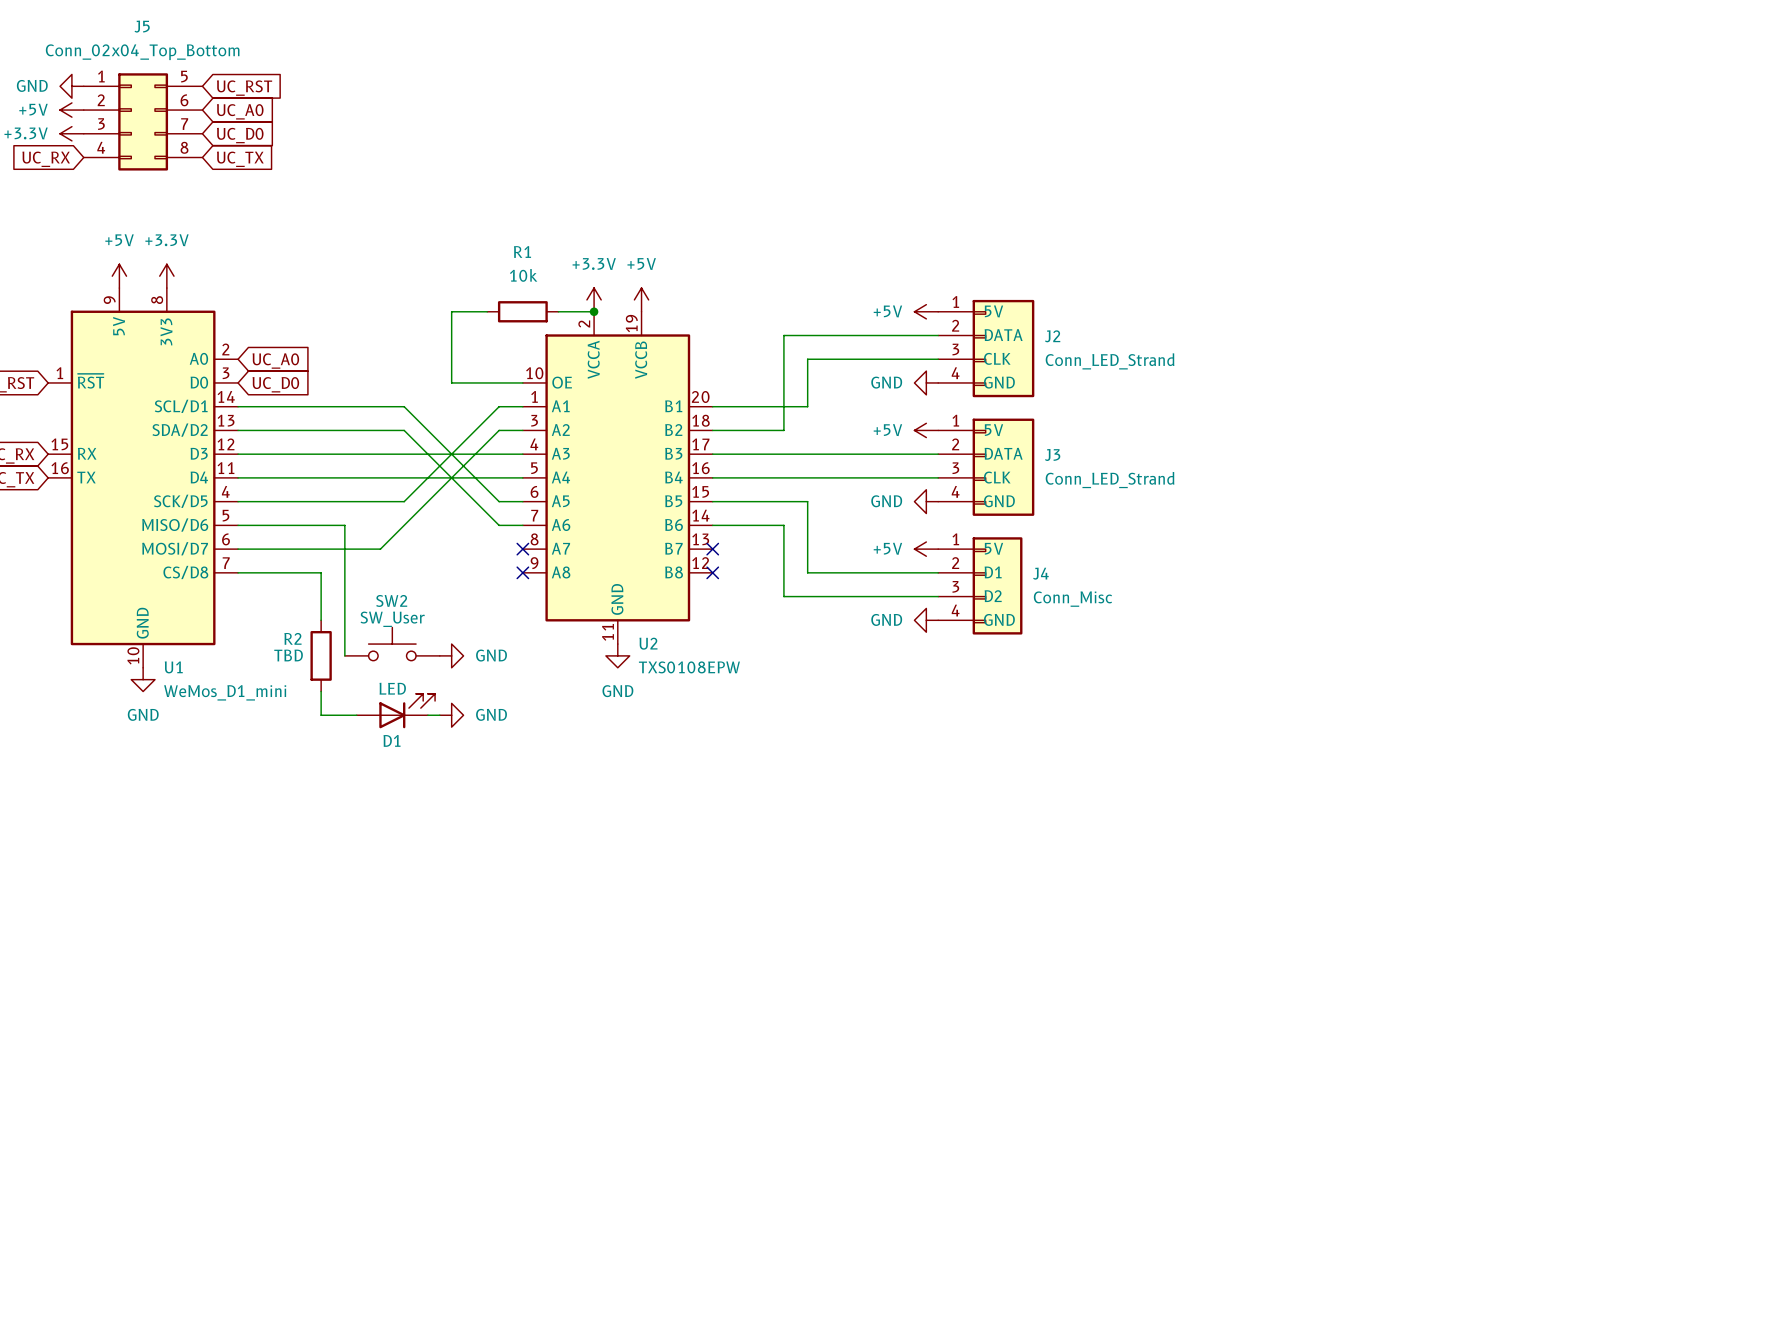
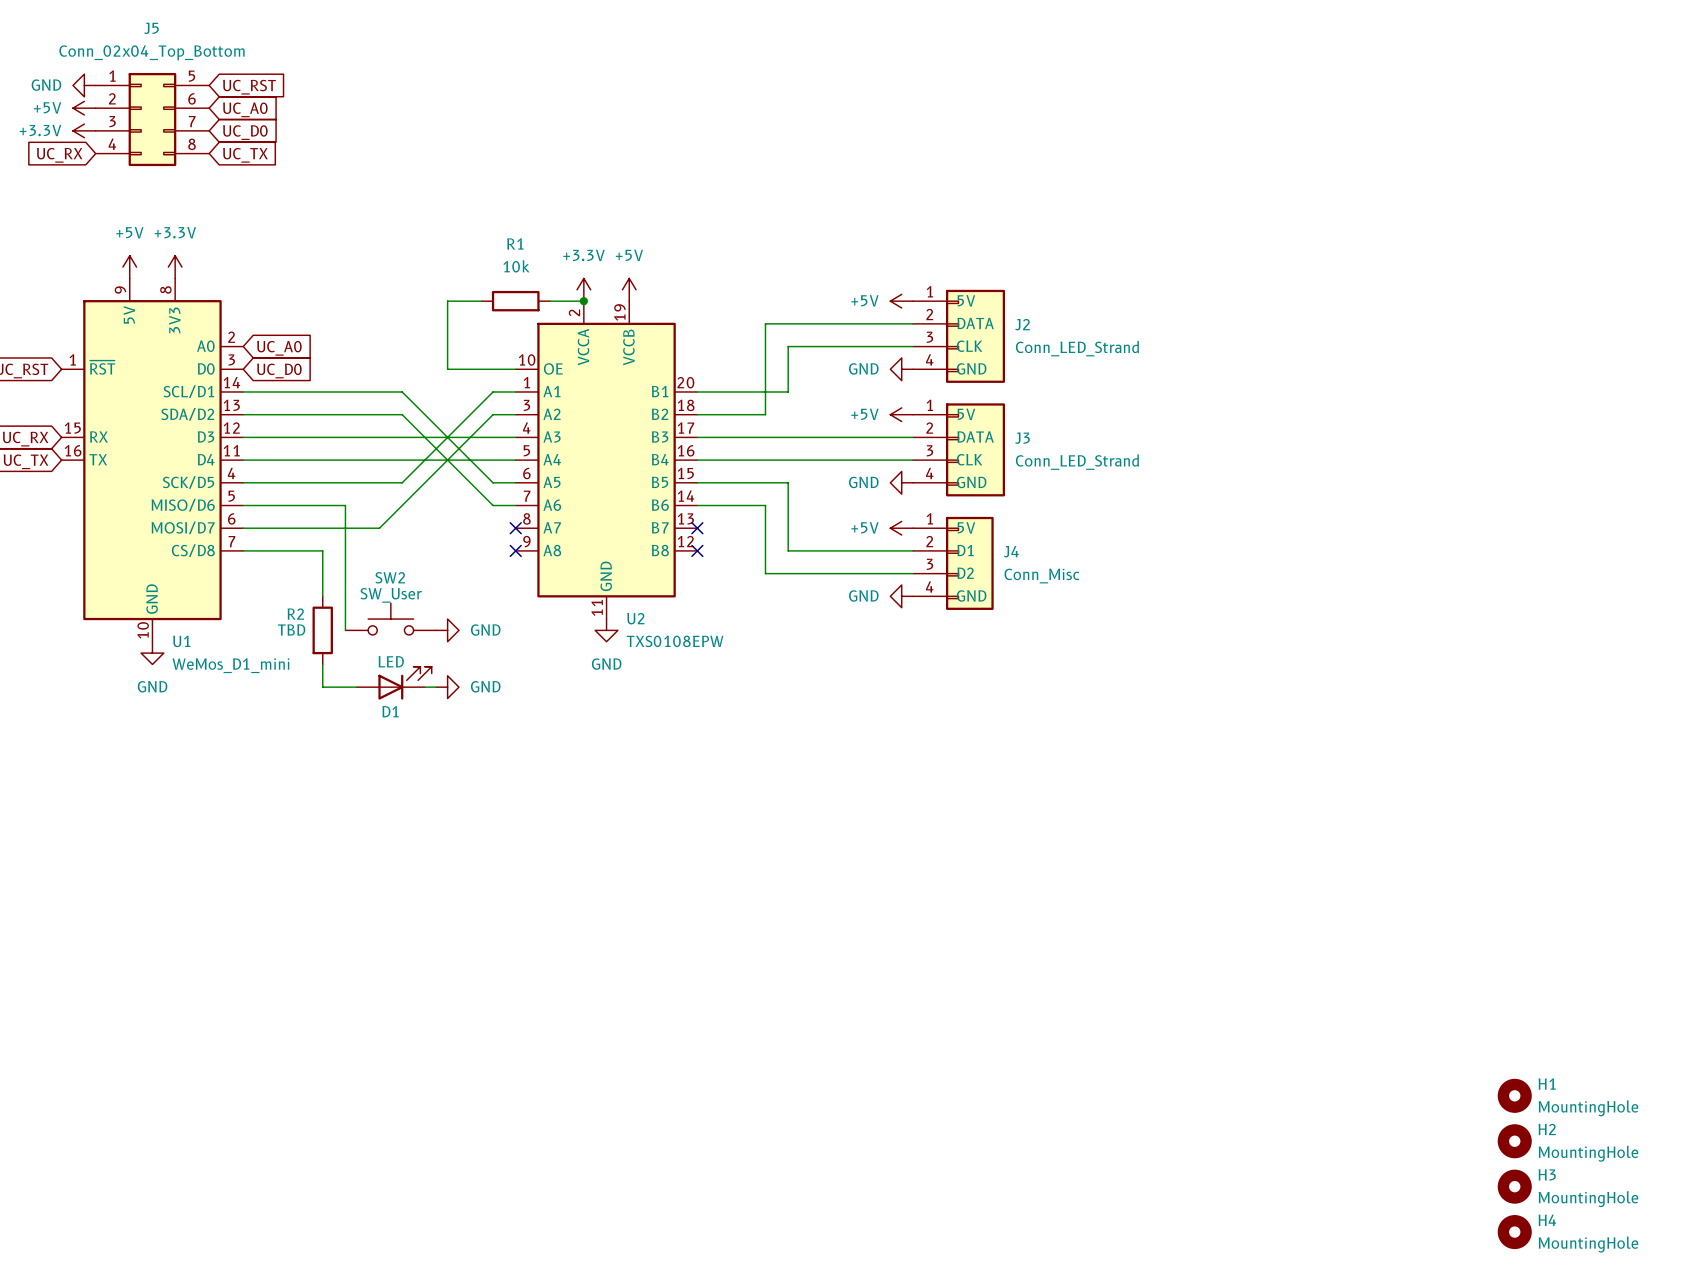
H1: none -> MountingHole (1514, 1095)
H2: none -> MountingHole (1514, 1141)
H3: none -> MountingHole (1514, 1186)
H4: none -> MountingHole (1514, 1232)

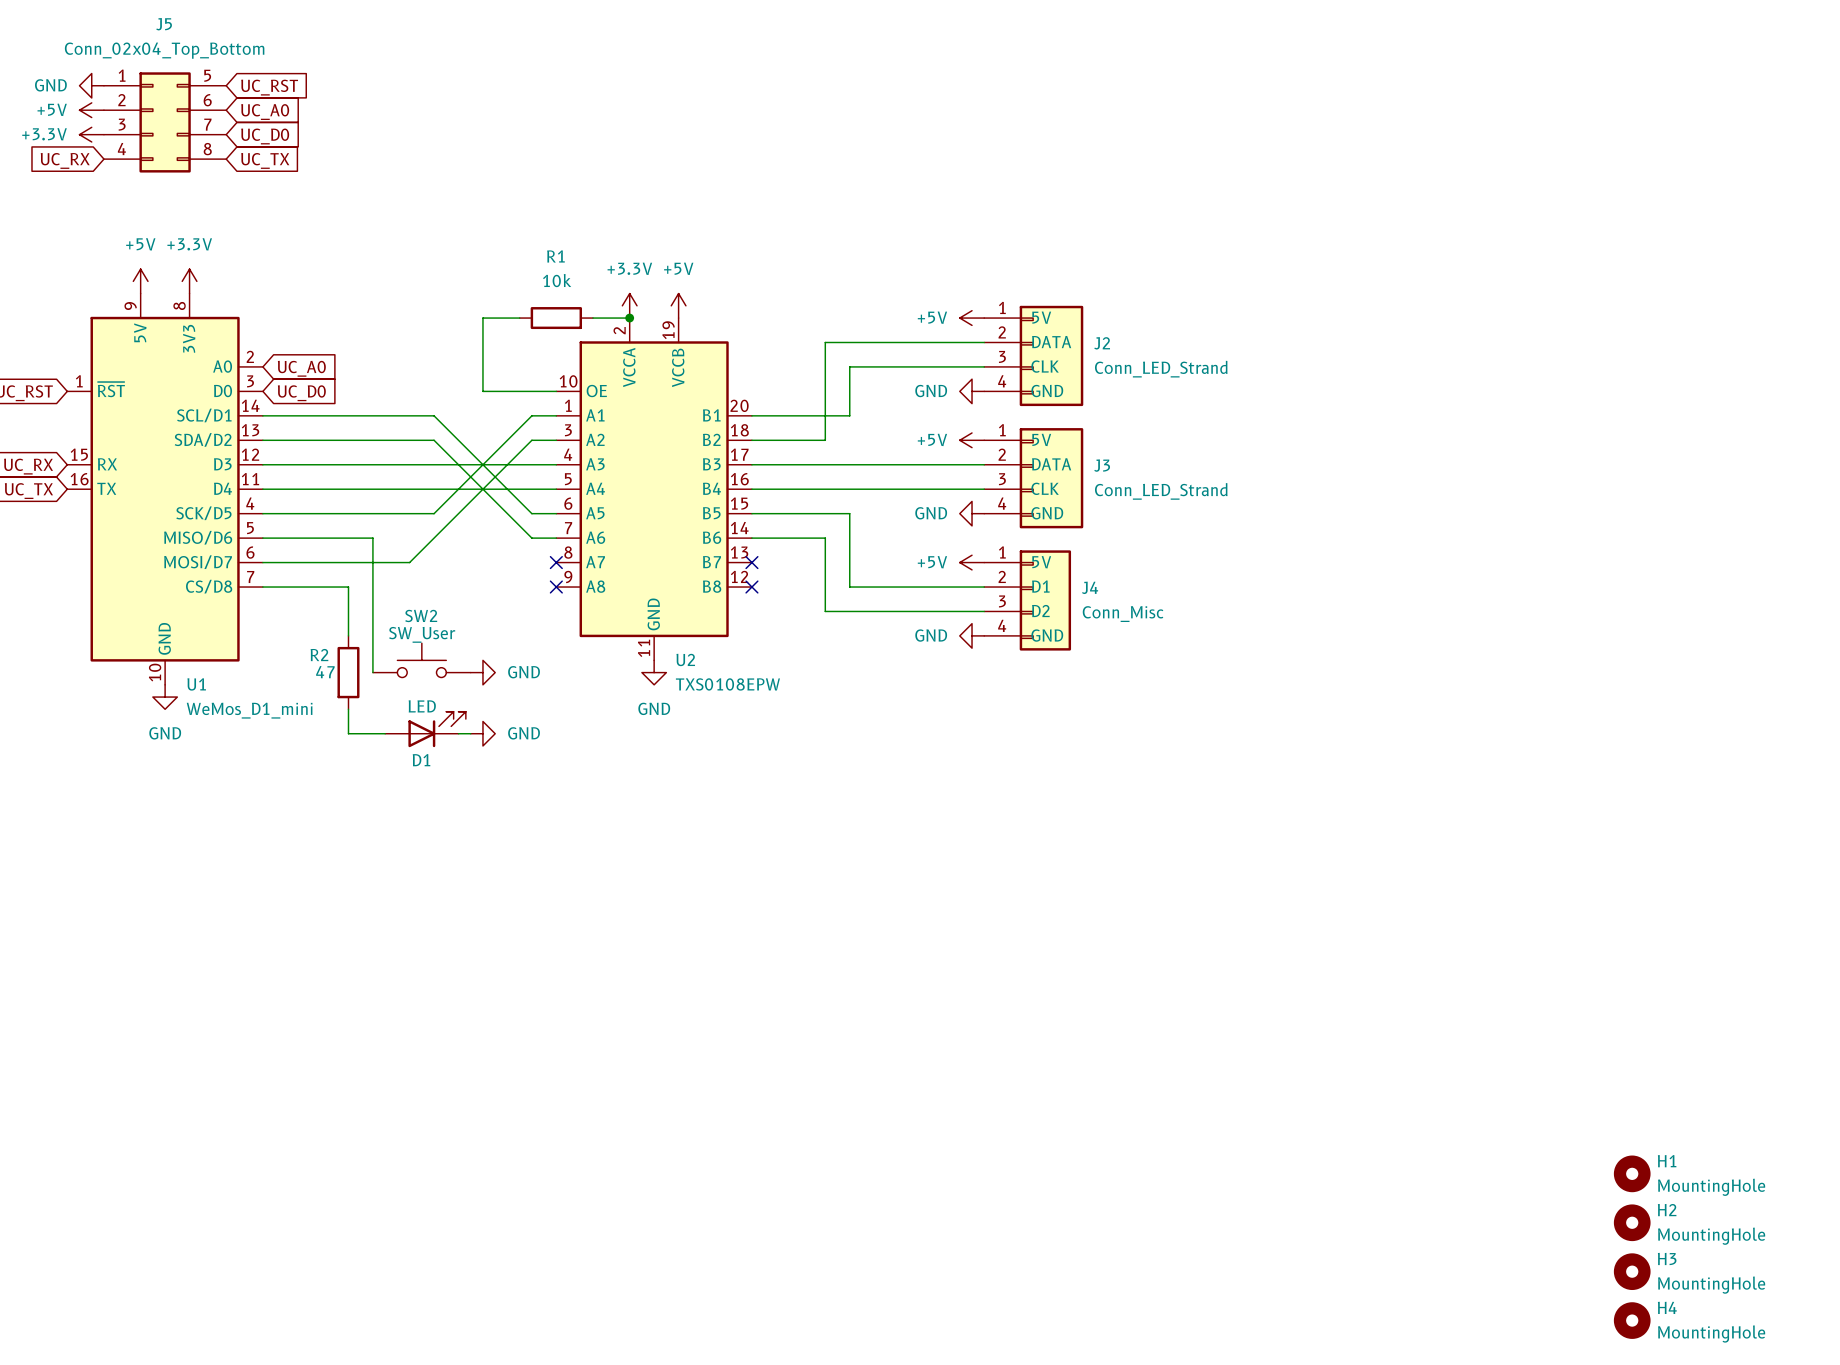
R2 value: TBD (291, 630) -> 47 (325, 672)

